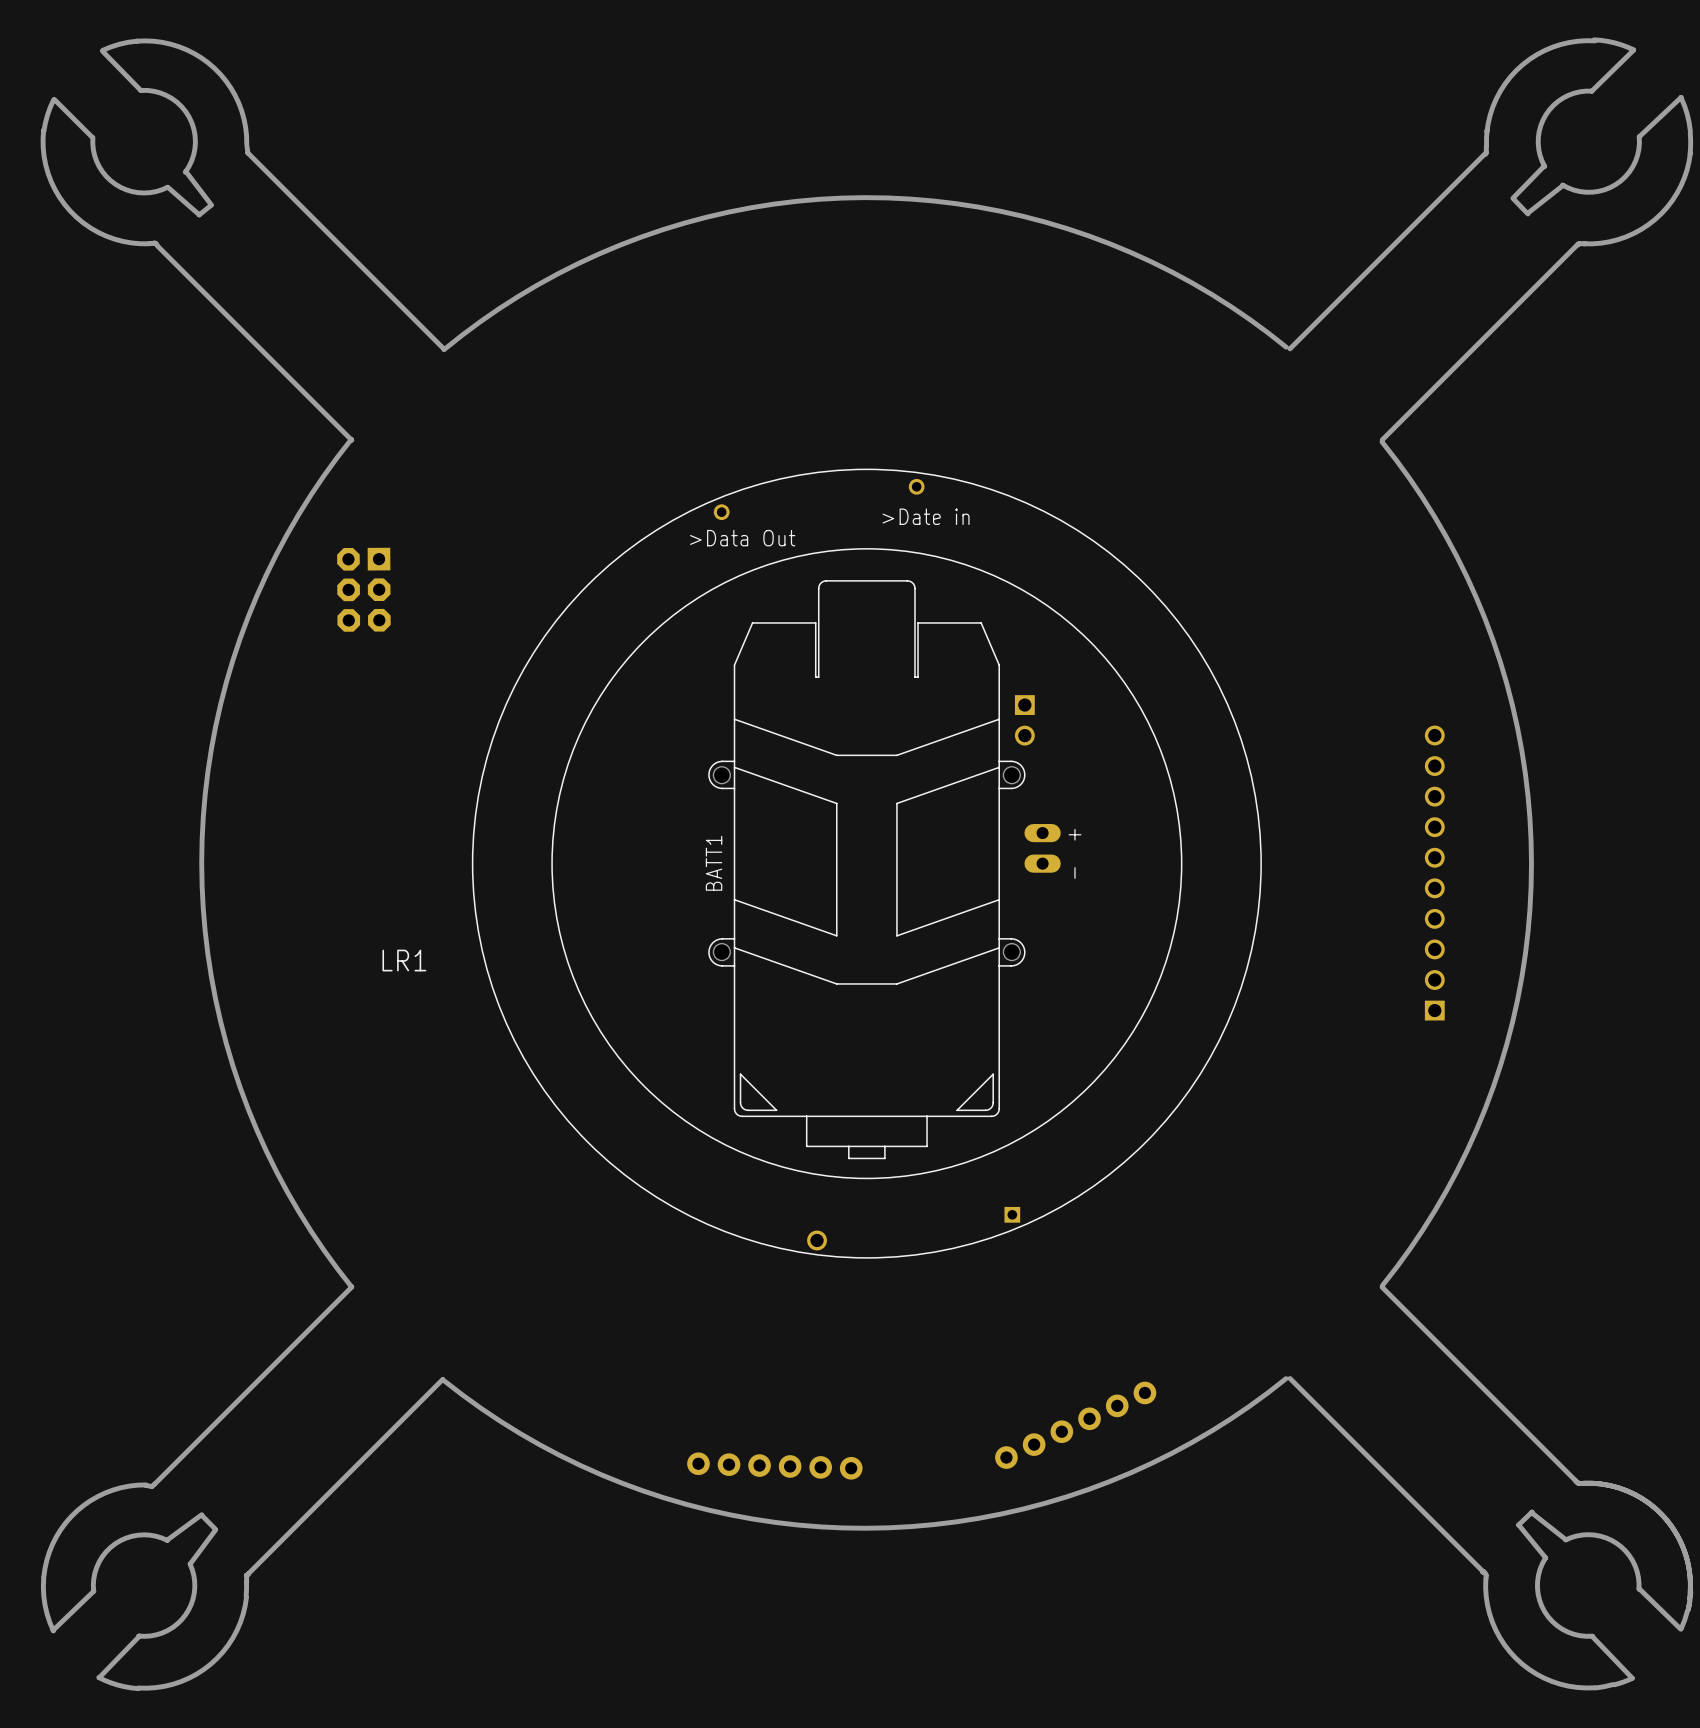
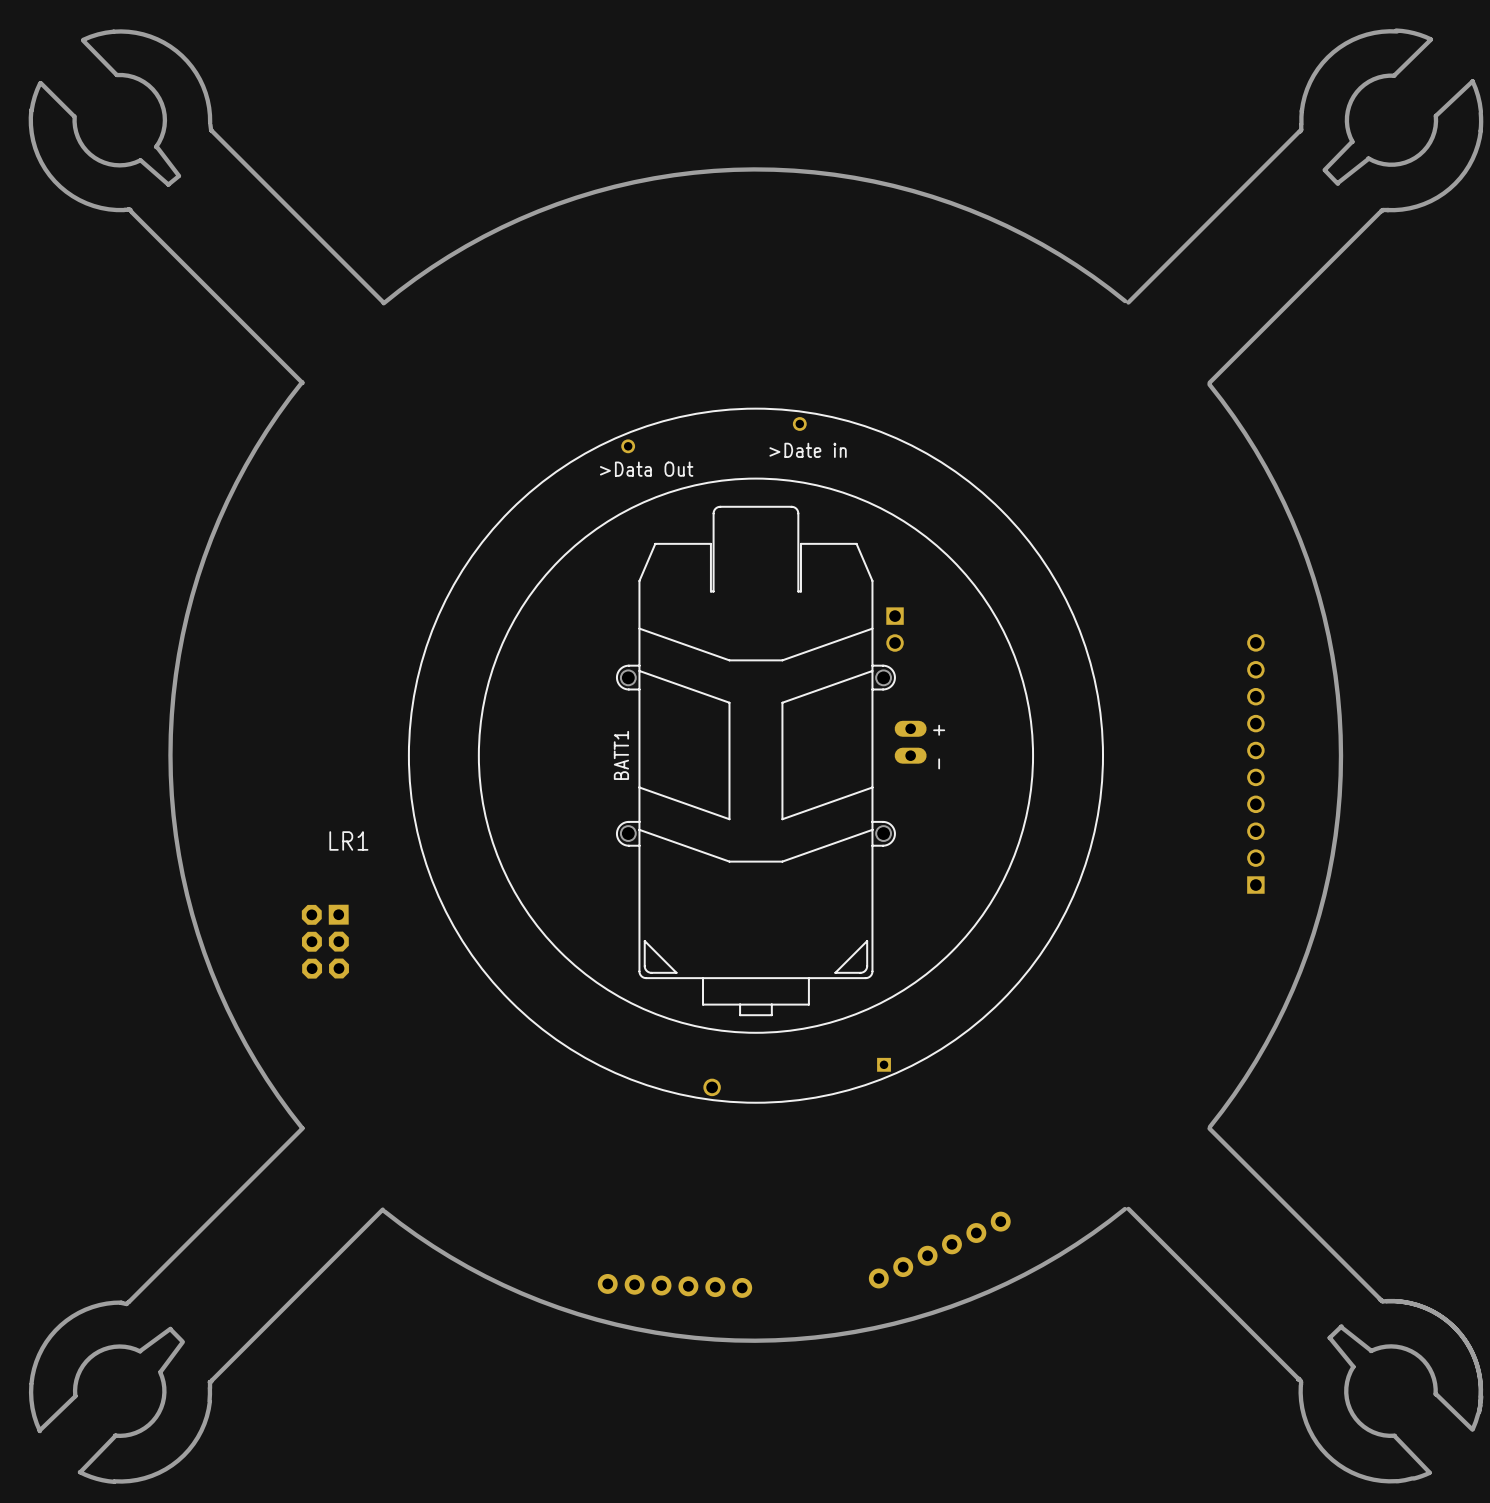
part: (363, 589) -> none
part: none -> (325, 941)

